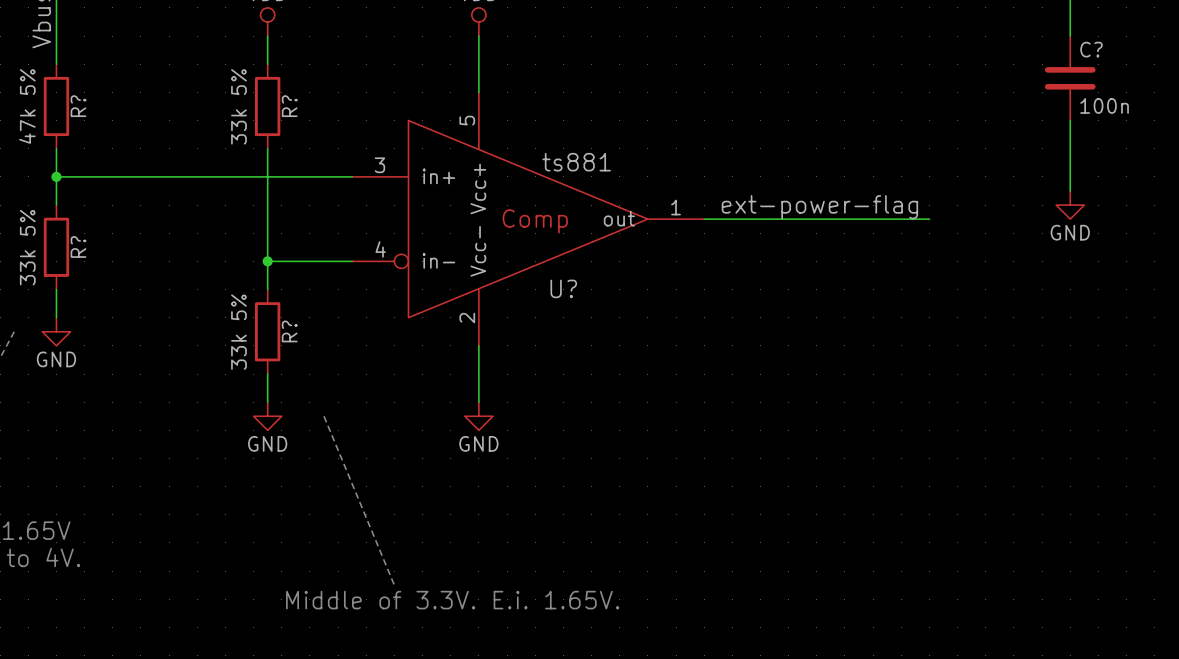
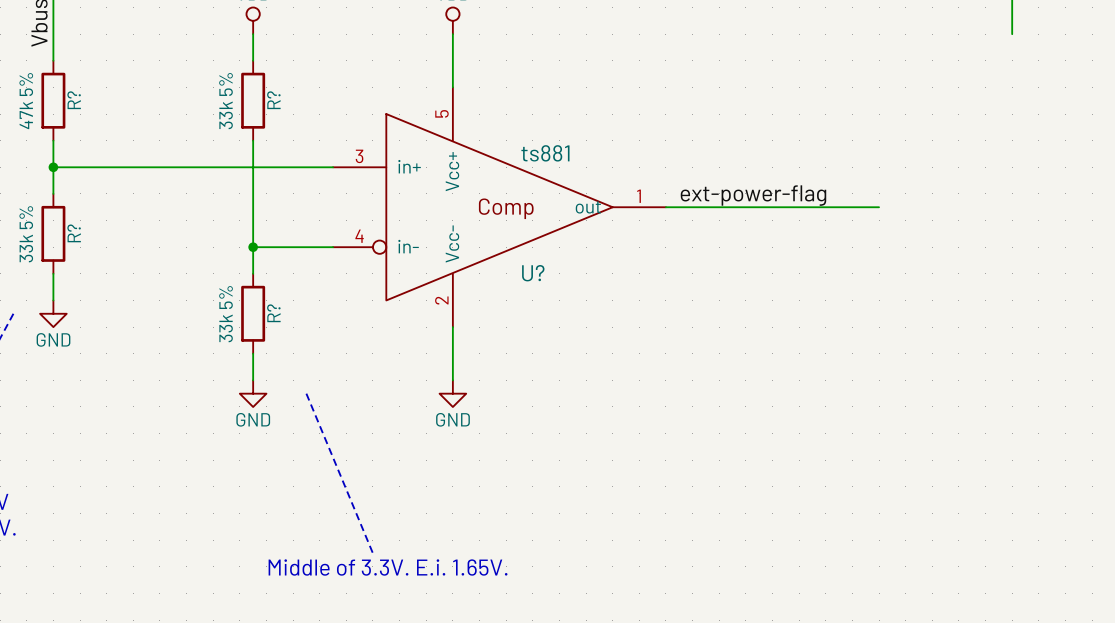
C?: 100n (1070, 78) -> none
wire: (1070, 120) (1070, 190) -> none
power symbol: GND (1070, 205) -> none

